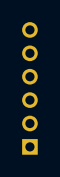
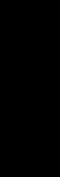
part: (29, 88) -> none

